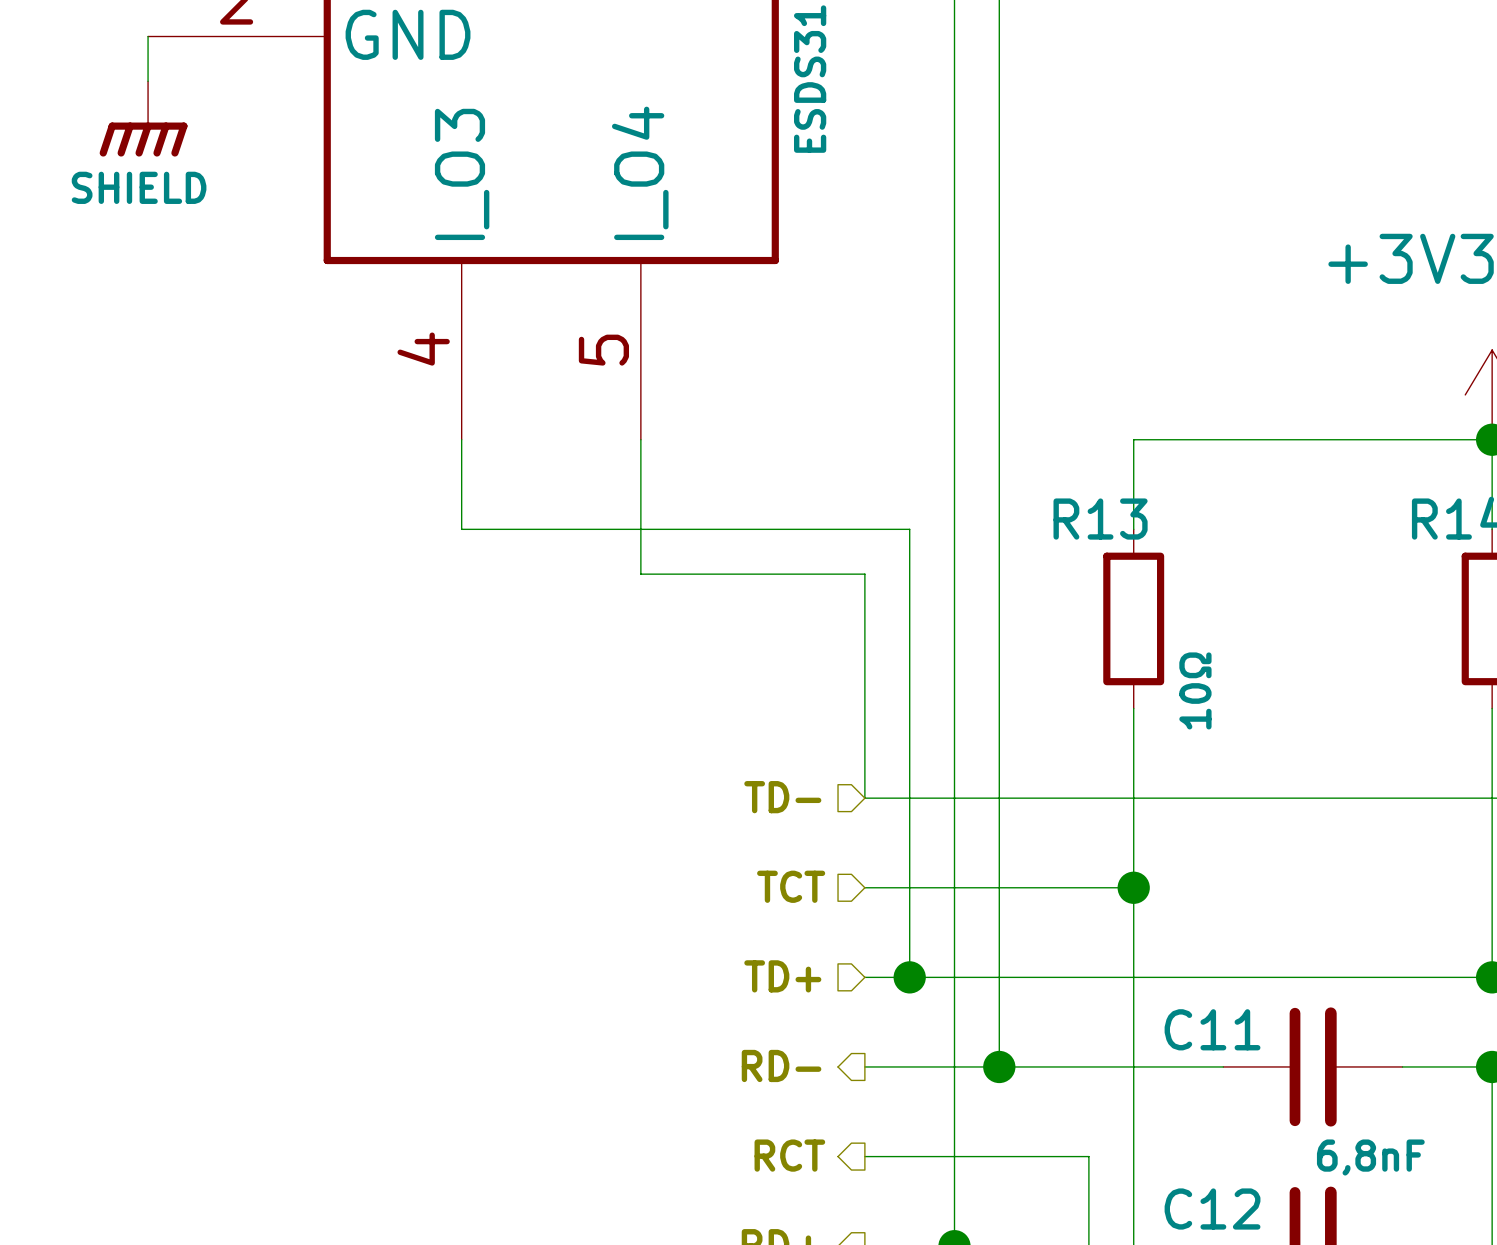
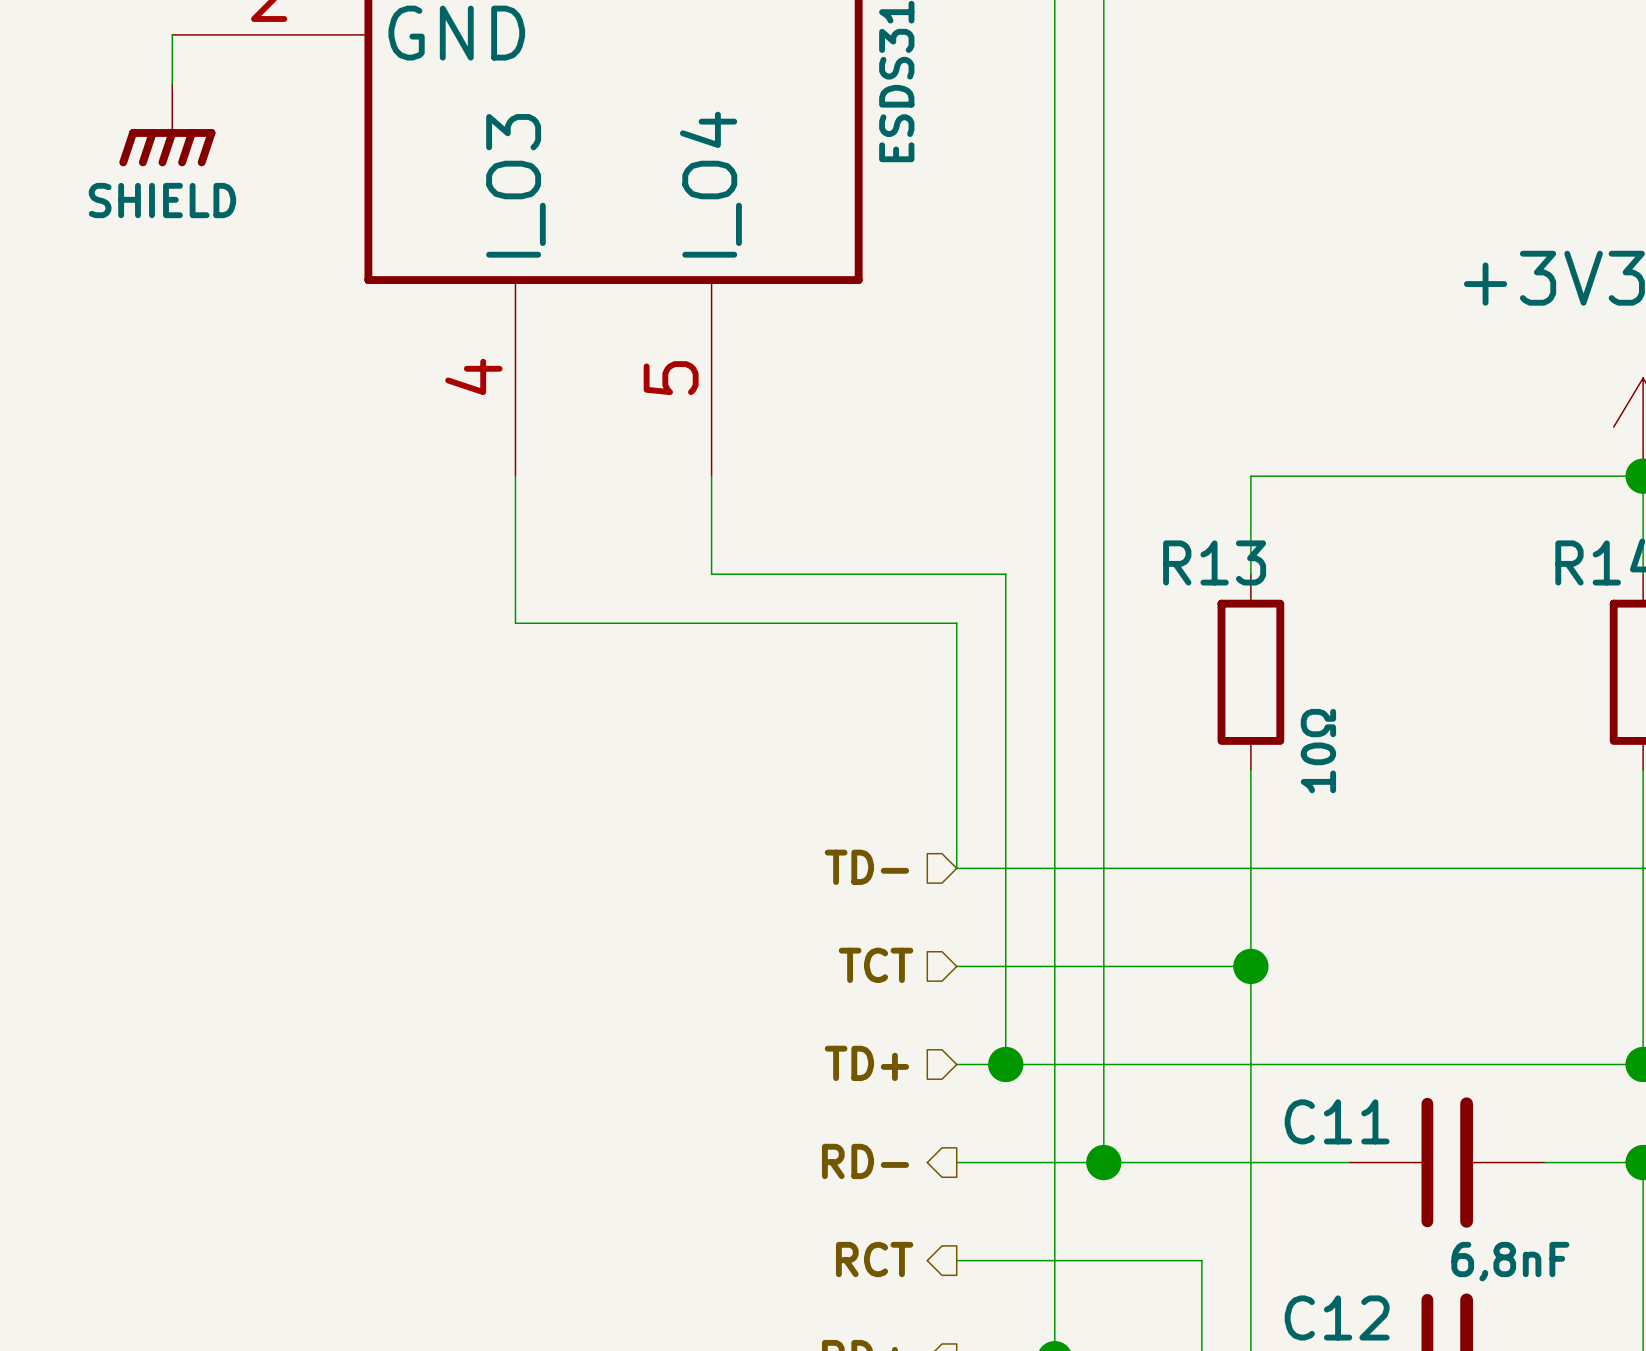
wire: (461, 529) (640, 529) (640, 574) -> (515, 574) (515, 623) (711, 623)

